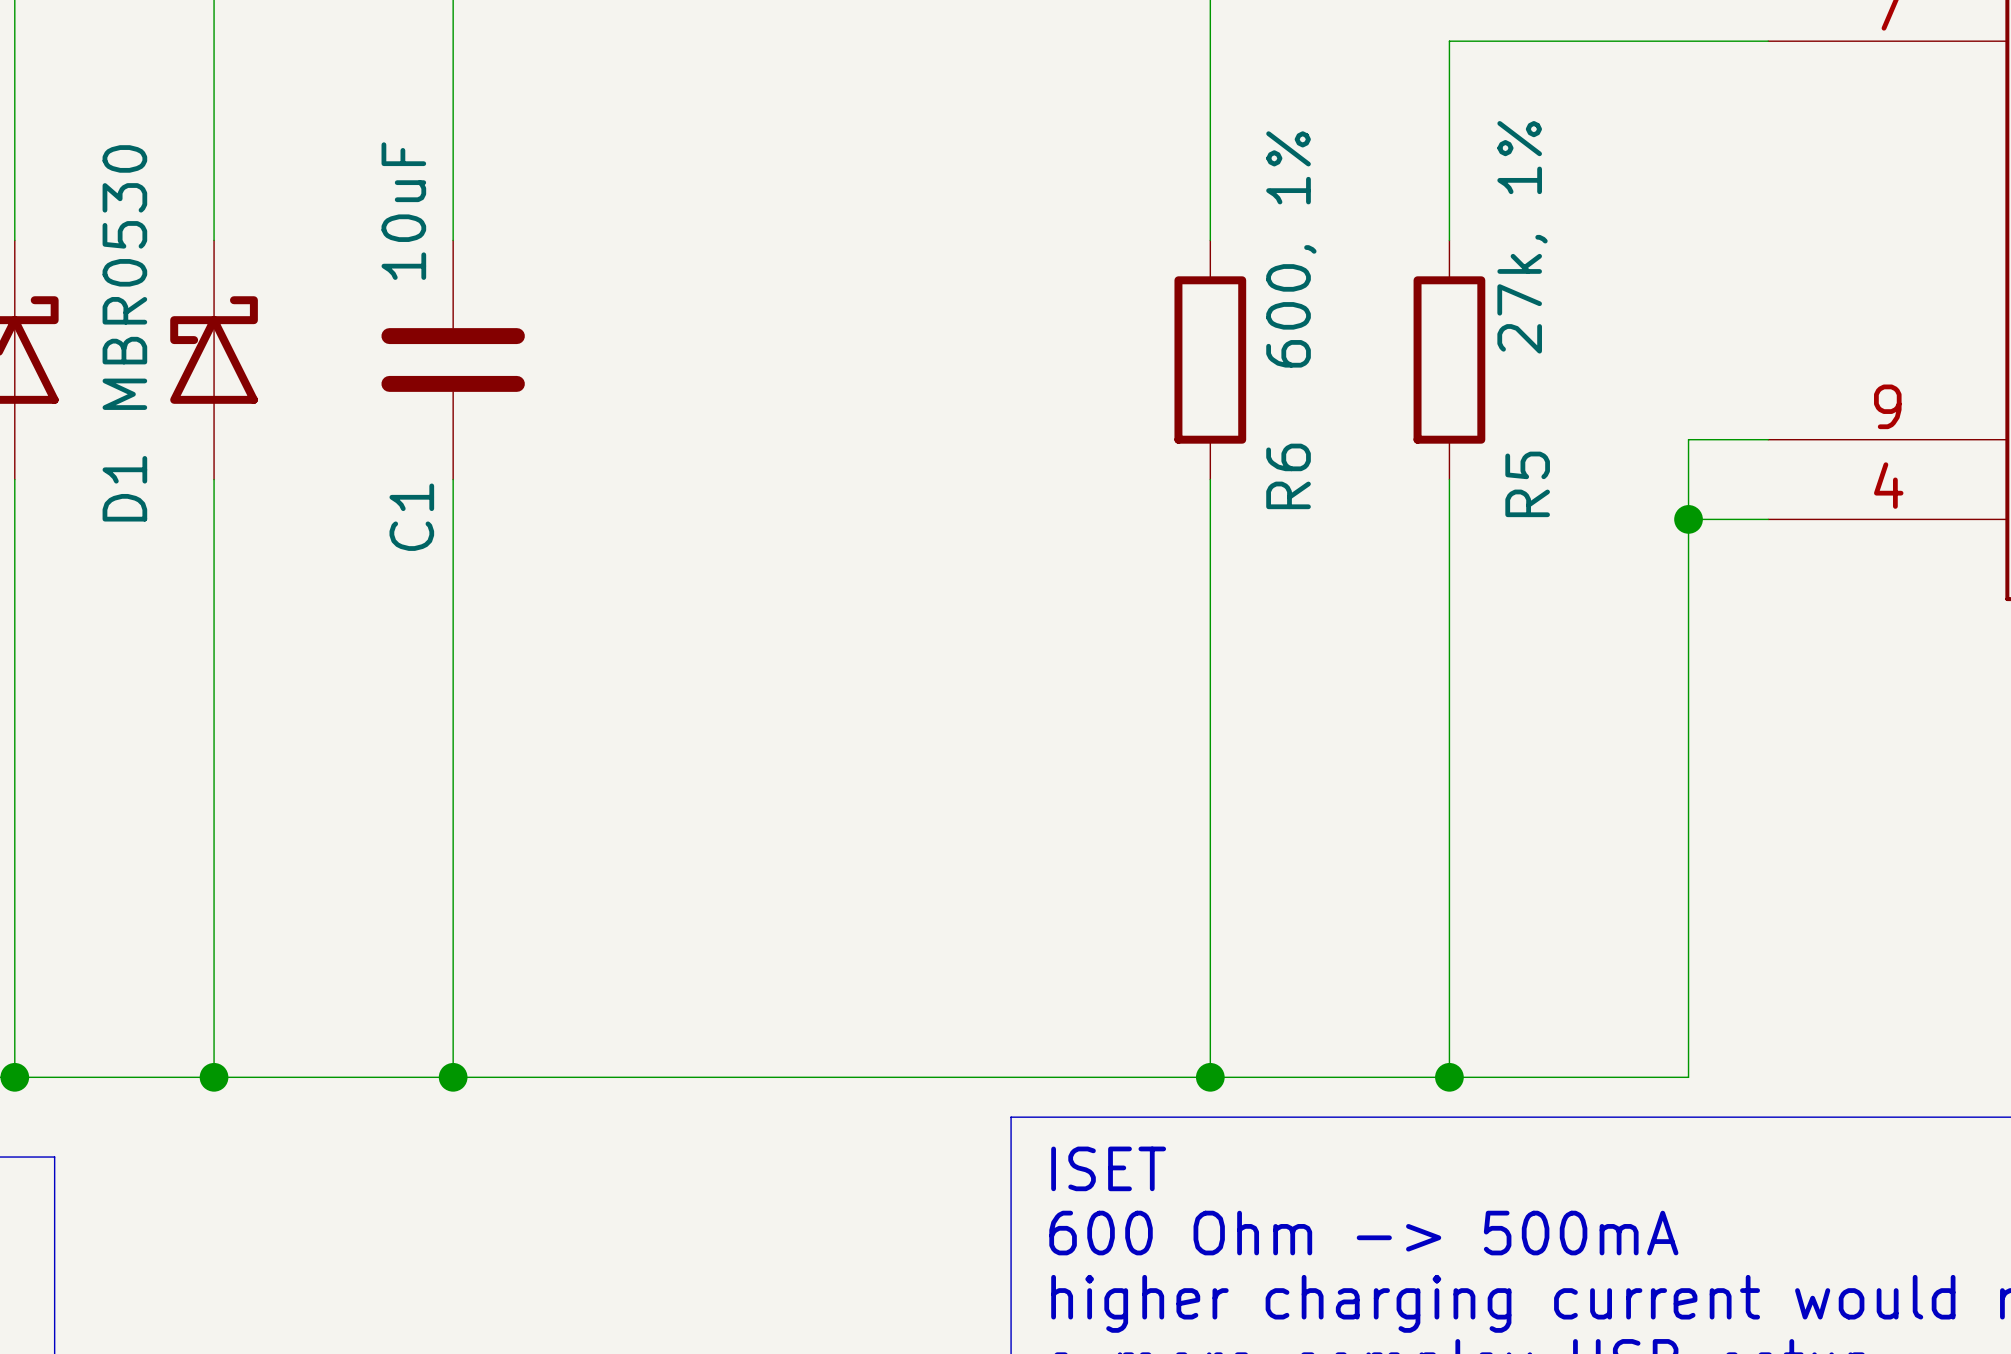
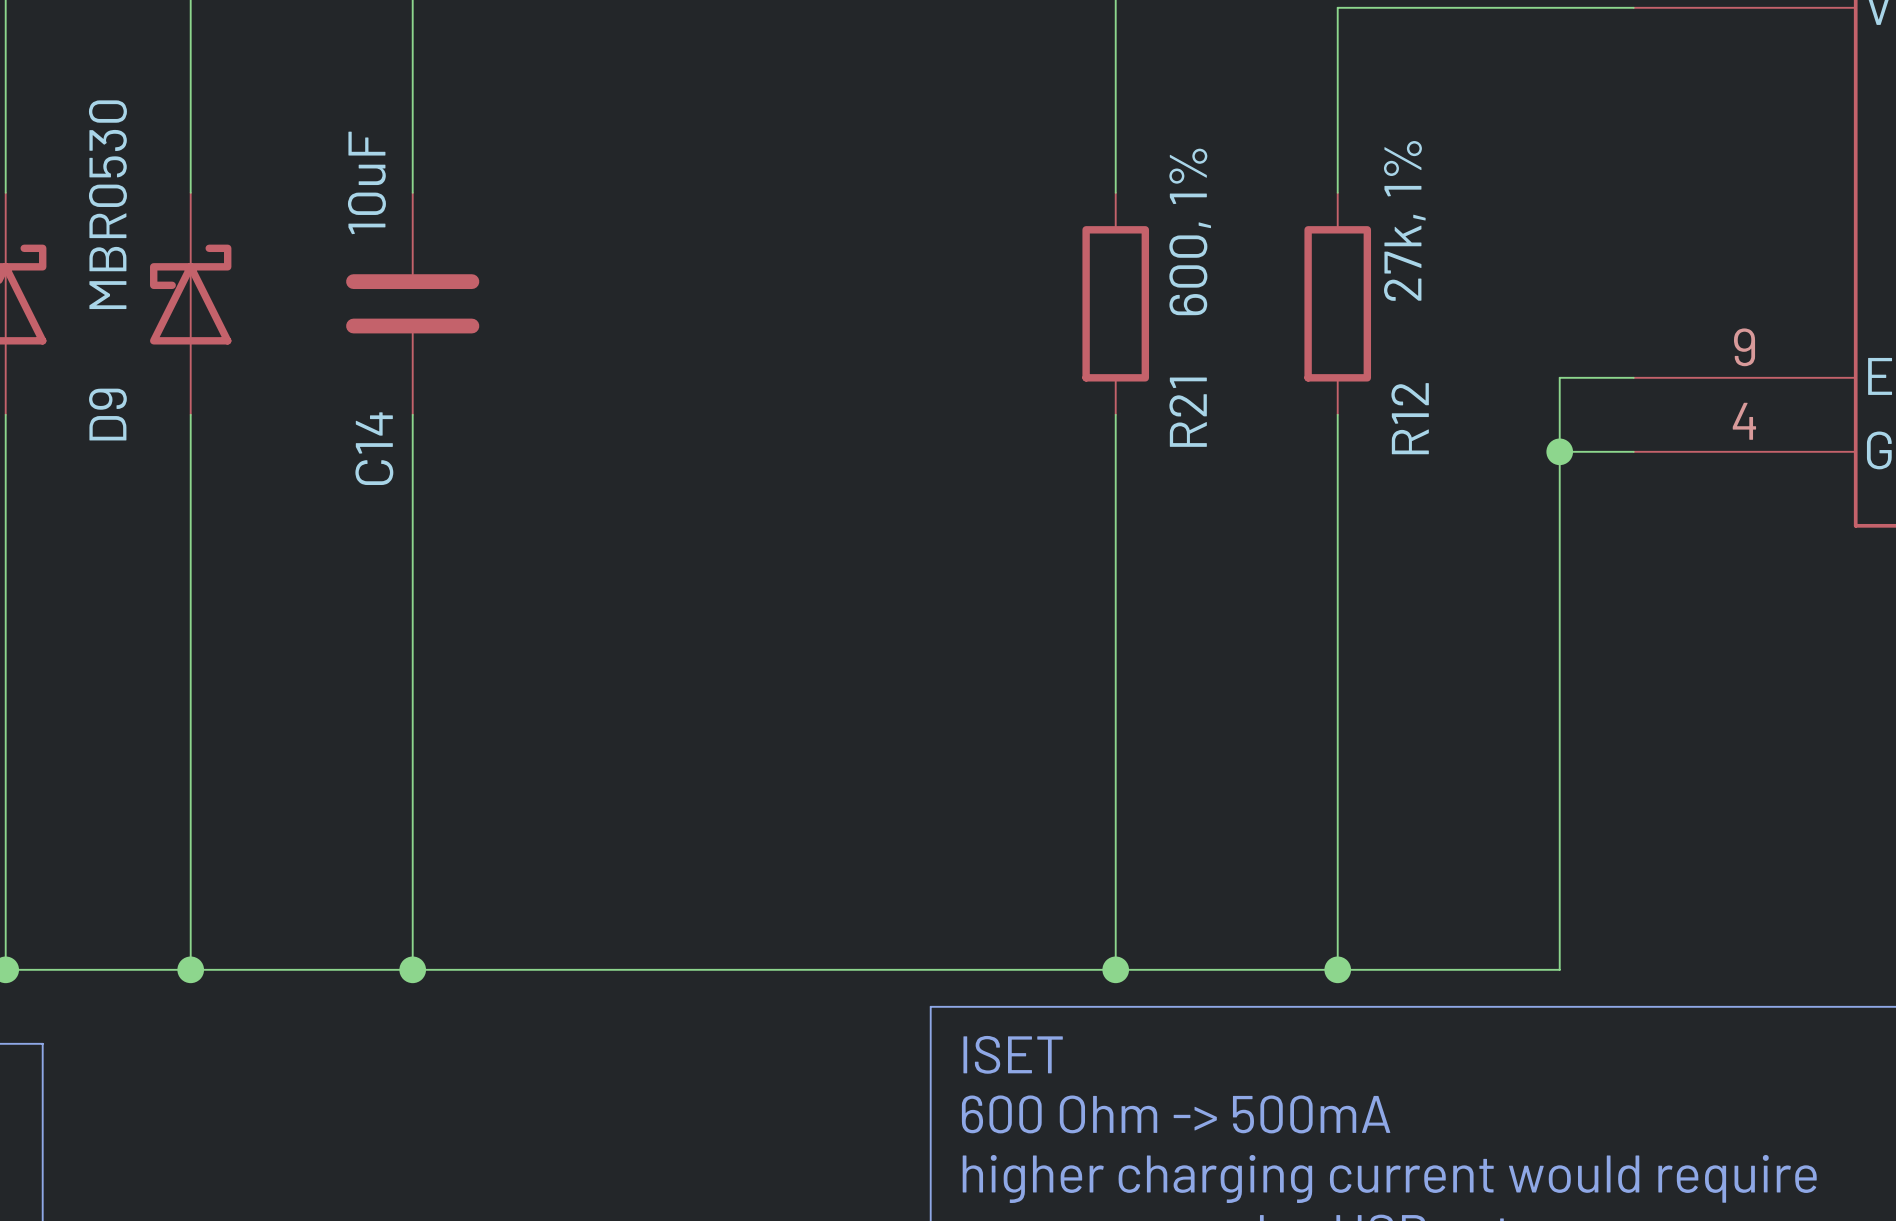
R6 name: R6 (1288, 476) -> R21 (1188, 412)
R5 name: R5 (1527, 484) -> R12 (1410, 418)
D1 name: D1 (124, 488) -> D9 (107, 414)
C1 name: C1 (411, 517) -> C14 (374, 448)

